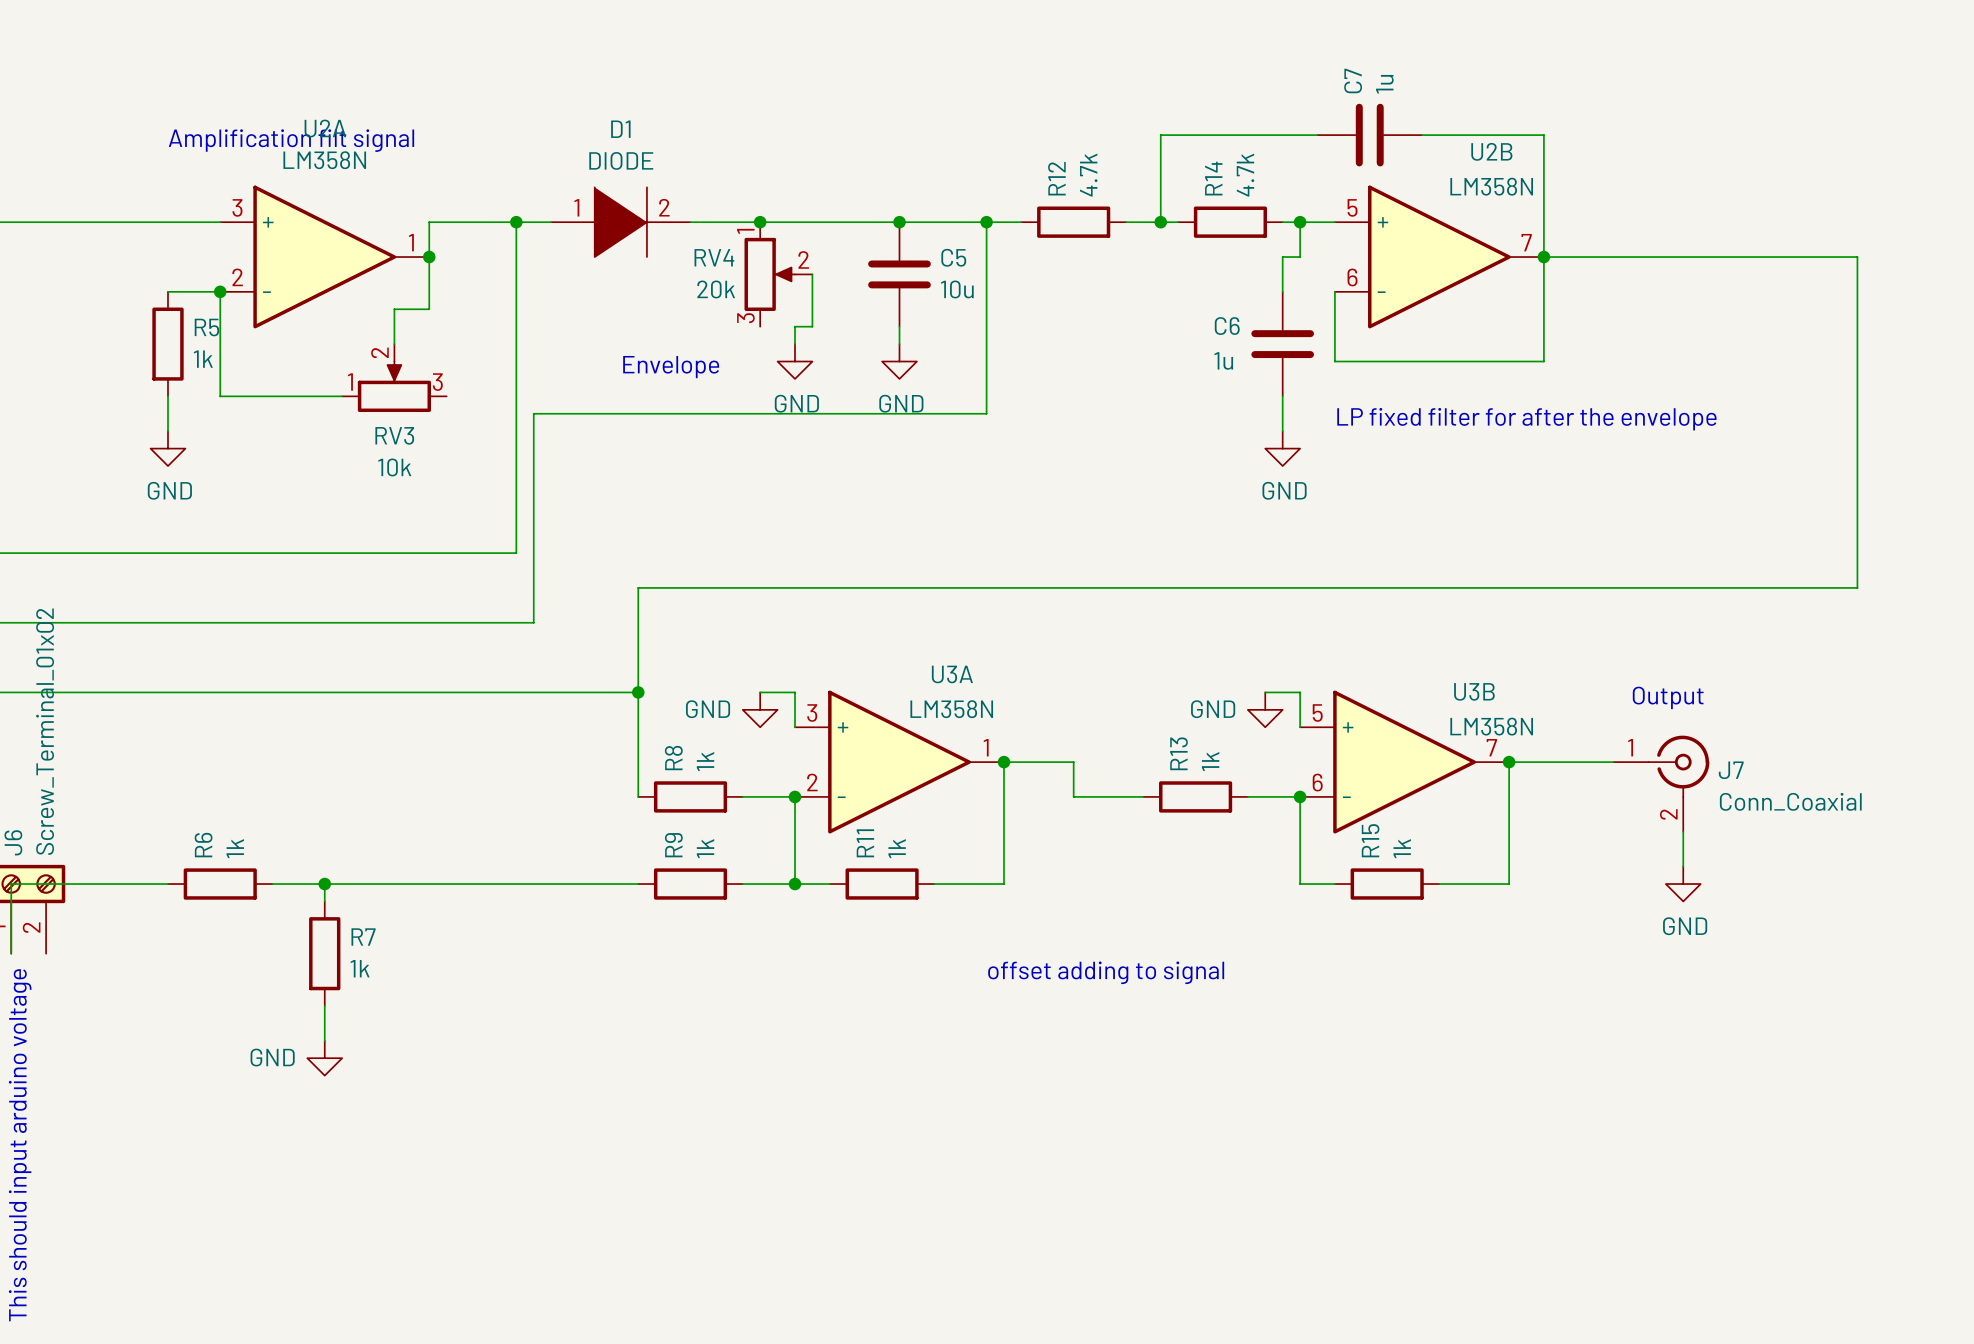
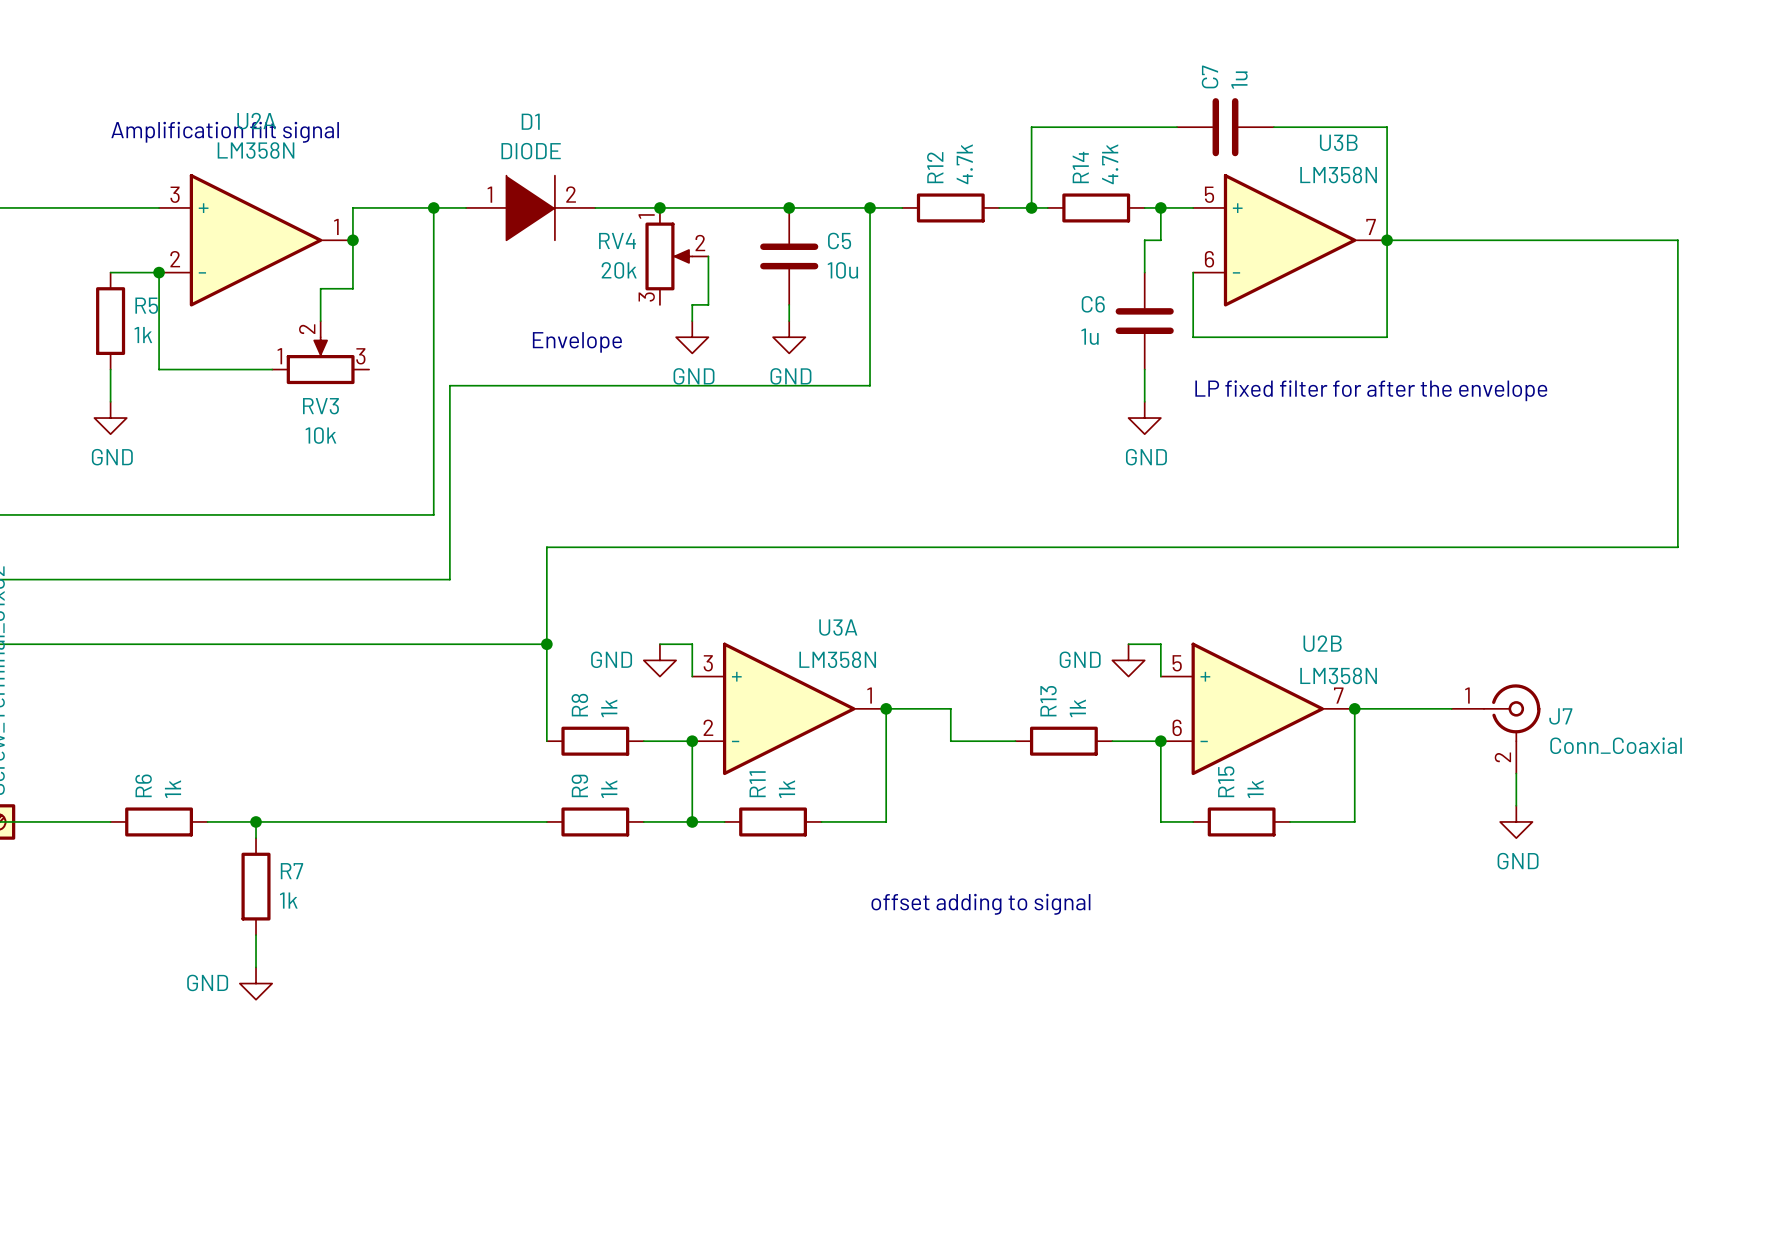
U2B name: U2B (1491, 151) -> U3B (1338, 142)
U3B name: U3B (1474, 691) -> U2B (1322, 643)
text: Output (1668, 697) -> none

